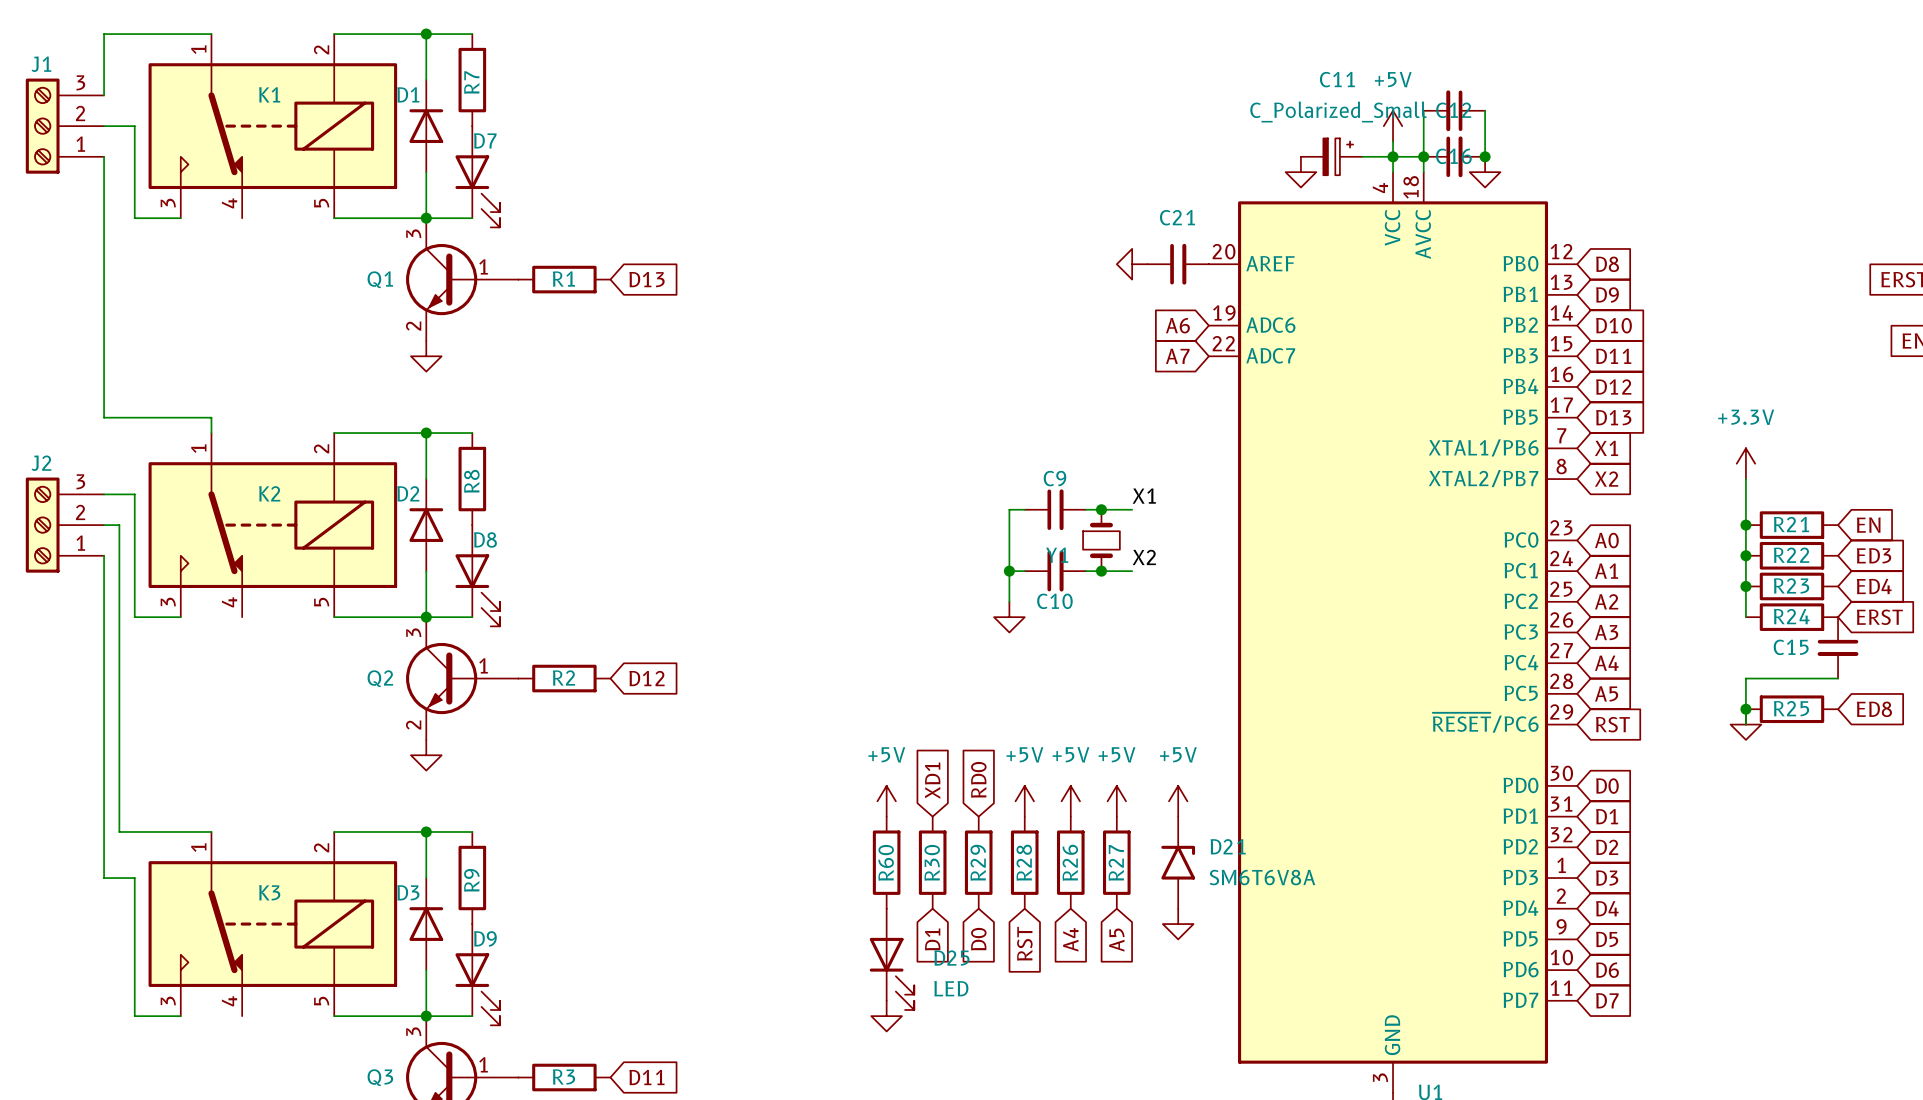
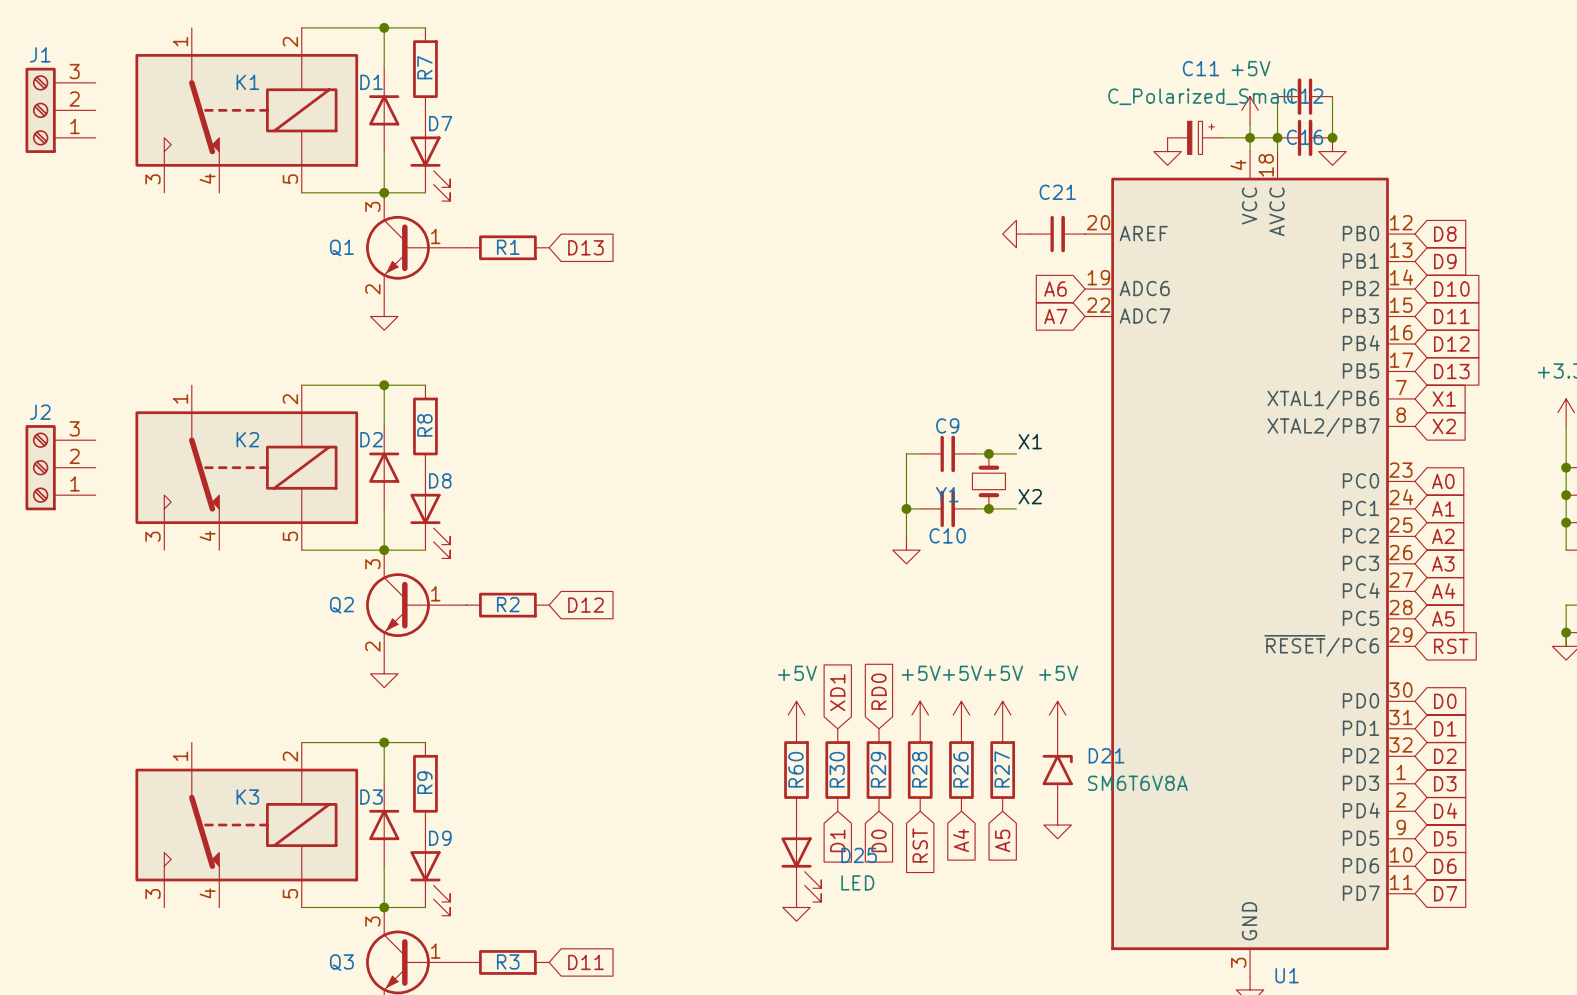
wire: (211, 34) (104, 34) (104, 95) -> none
wire: (104, 126) (134, 126) (134, 218) (180, 218) -> none
wire: (104, 156) (104, 417) (211, 417) (211, 433) -> none
wire: (104, 494) (134, 494) (134, 617) (180, 617) -> none
wire: (104, 525) (119, 525) (119, 831) (211, 831) -> none
wire: (104, 555) (104, 878) (134, 878) (134, 1016) (180, 1016) -> none

